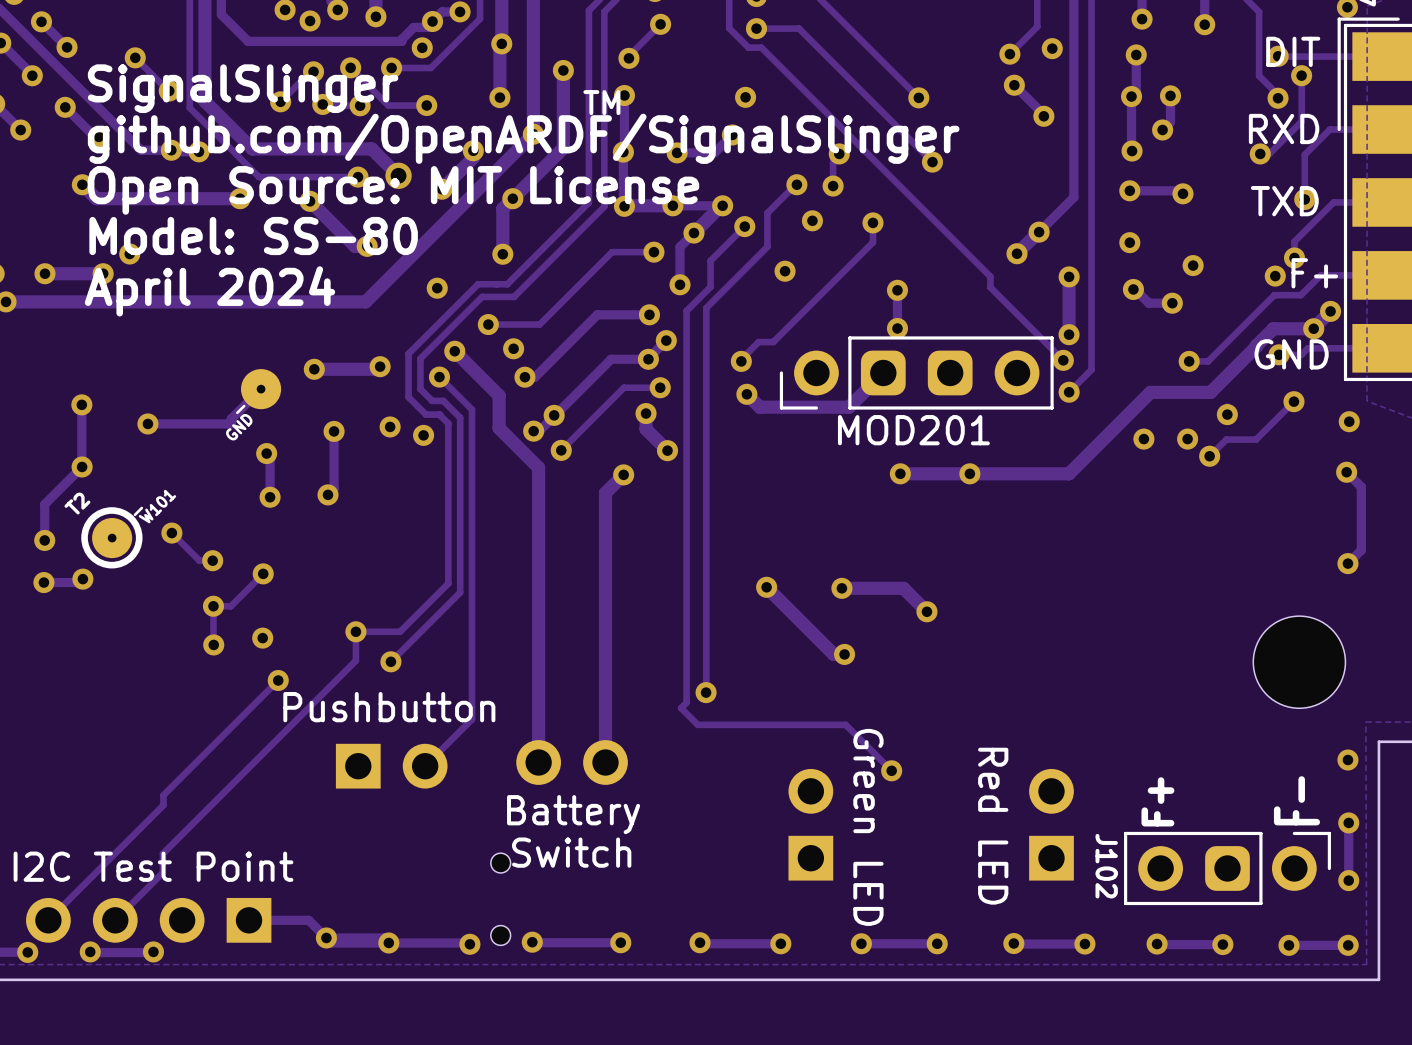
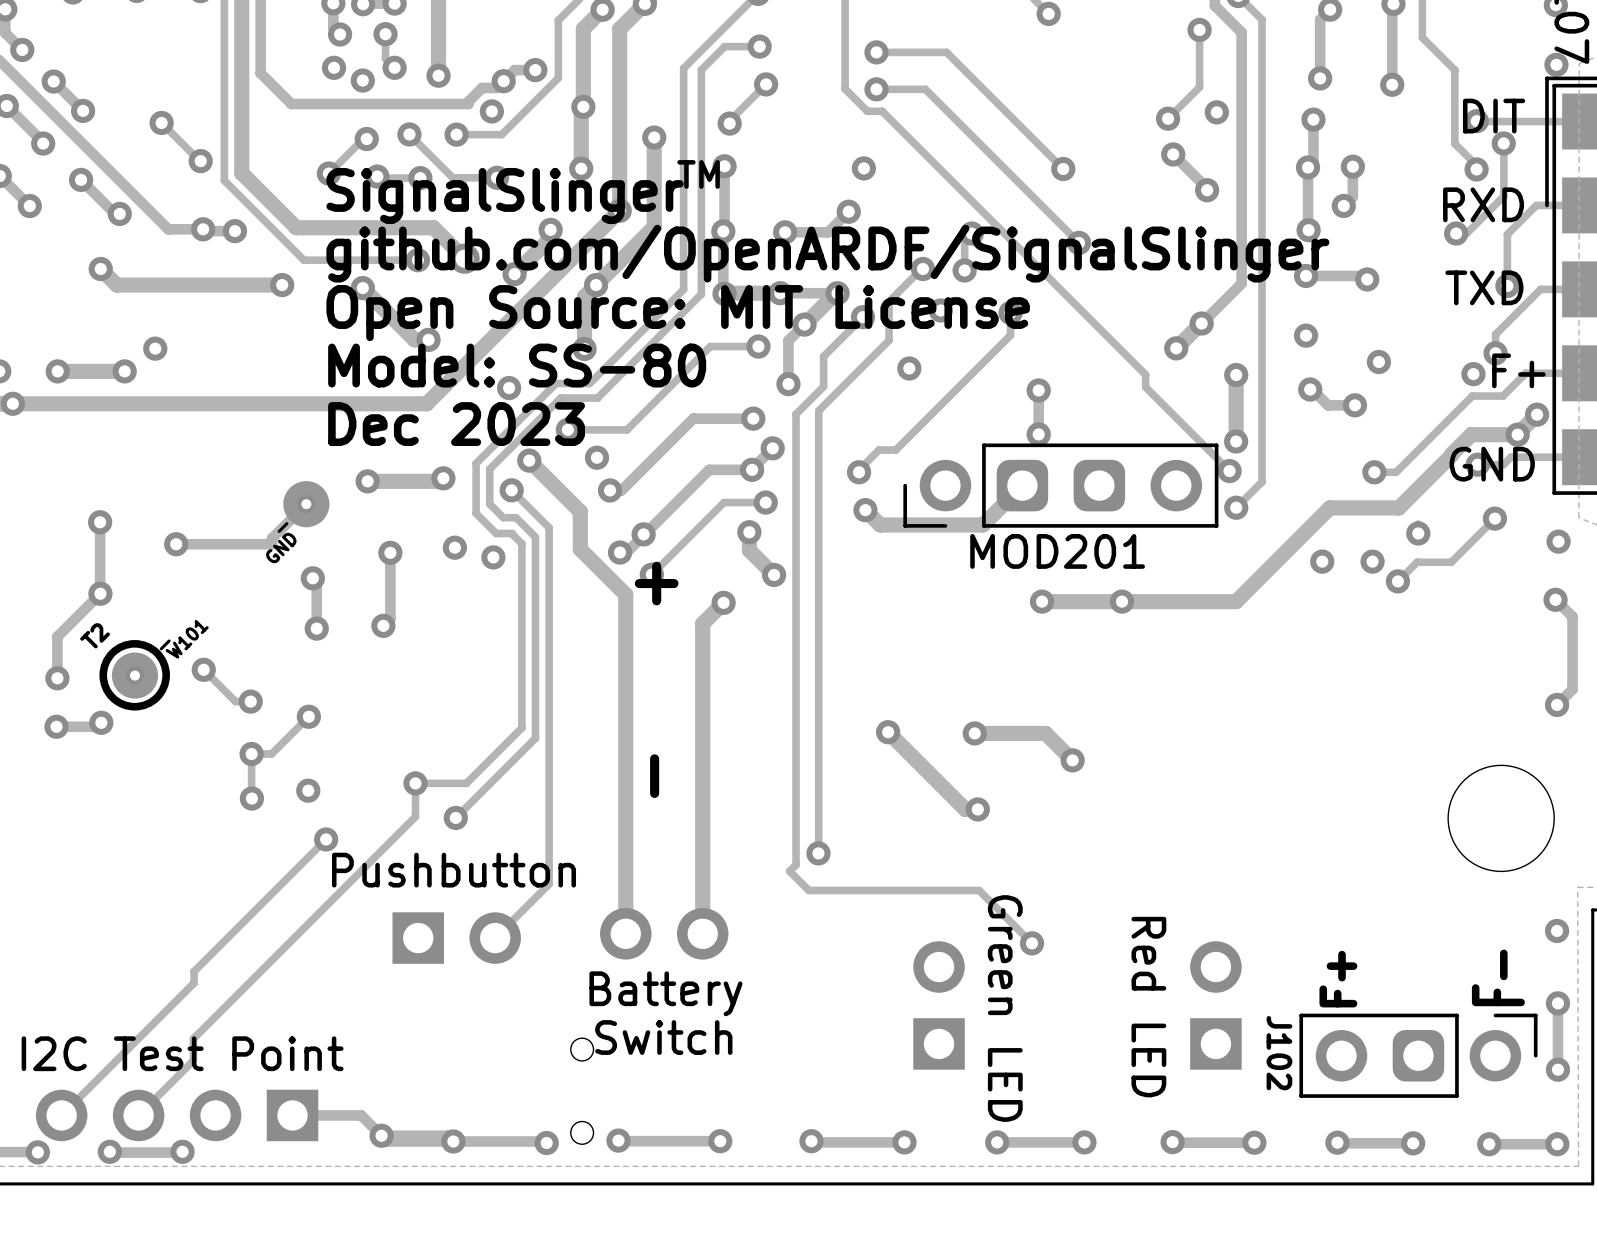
text position: SignalSlinger (243, 88) -> SignalSlinger (505, 195)
text position: github.com/OpenARDF/SignalSlinger (523, 138) -> github.com/OpenARDF/SignalSlinger (827, 253)
text position: Open Source: MIT License (393, 190) -> Open Source: MIT License (678, 313)
text position: Model: SS-80 (253, 236) -> Model: SS-80 (517, 365)
text: April 2024 (209, 291) -> none
text: none -> Dec 2023 (456, 424)
text: none -> + (656, 583)
text: none -> - (654, 776)

